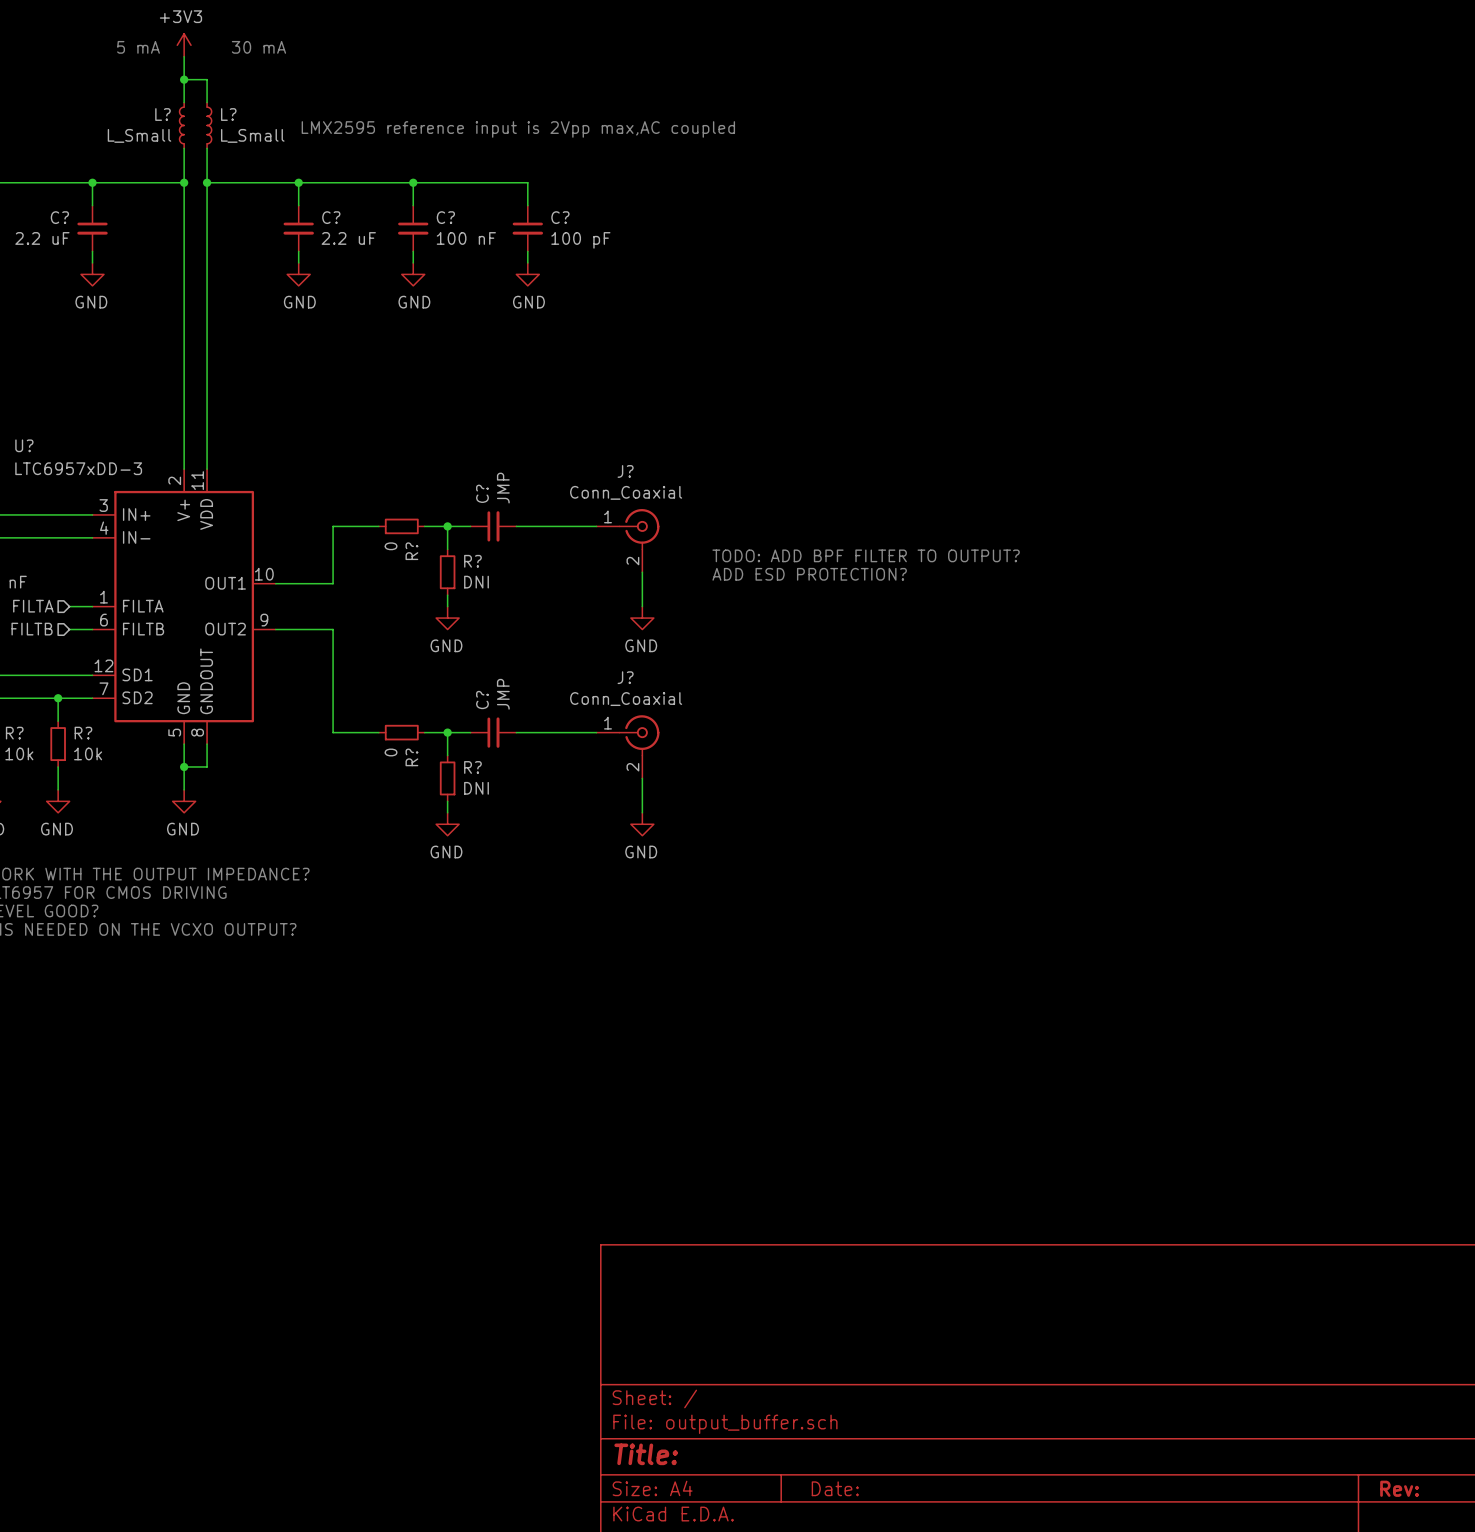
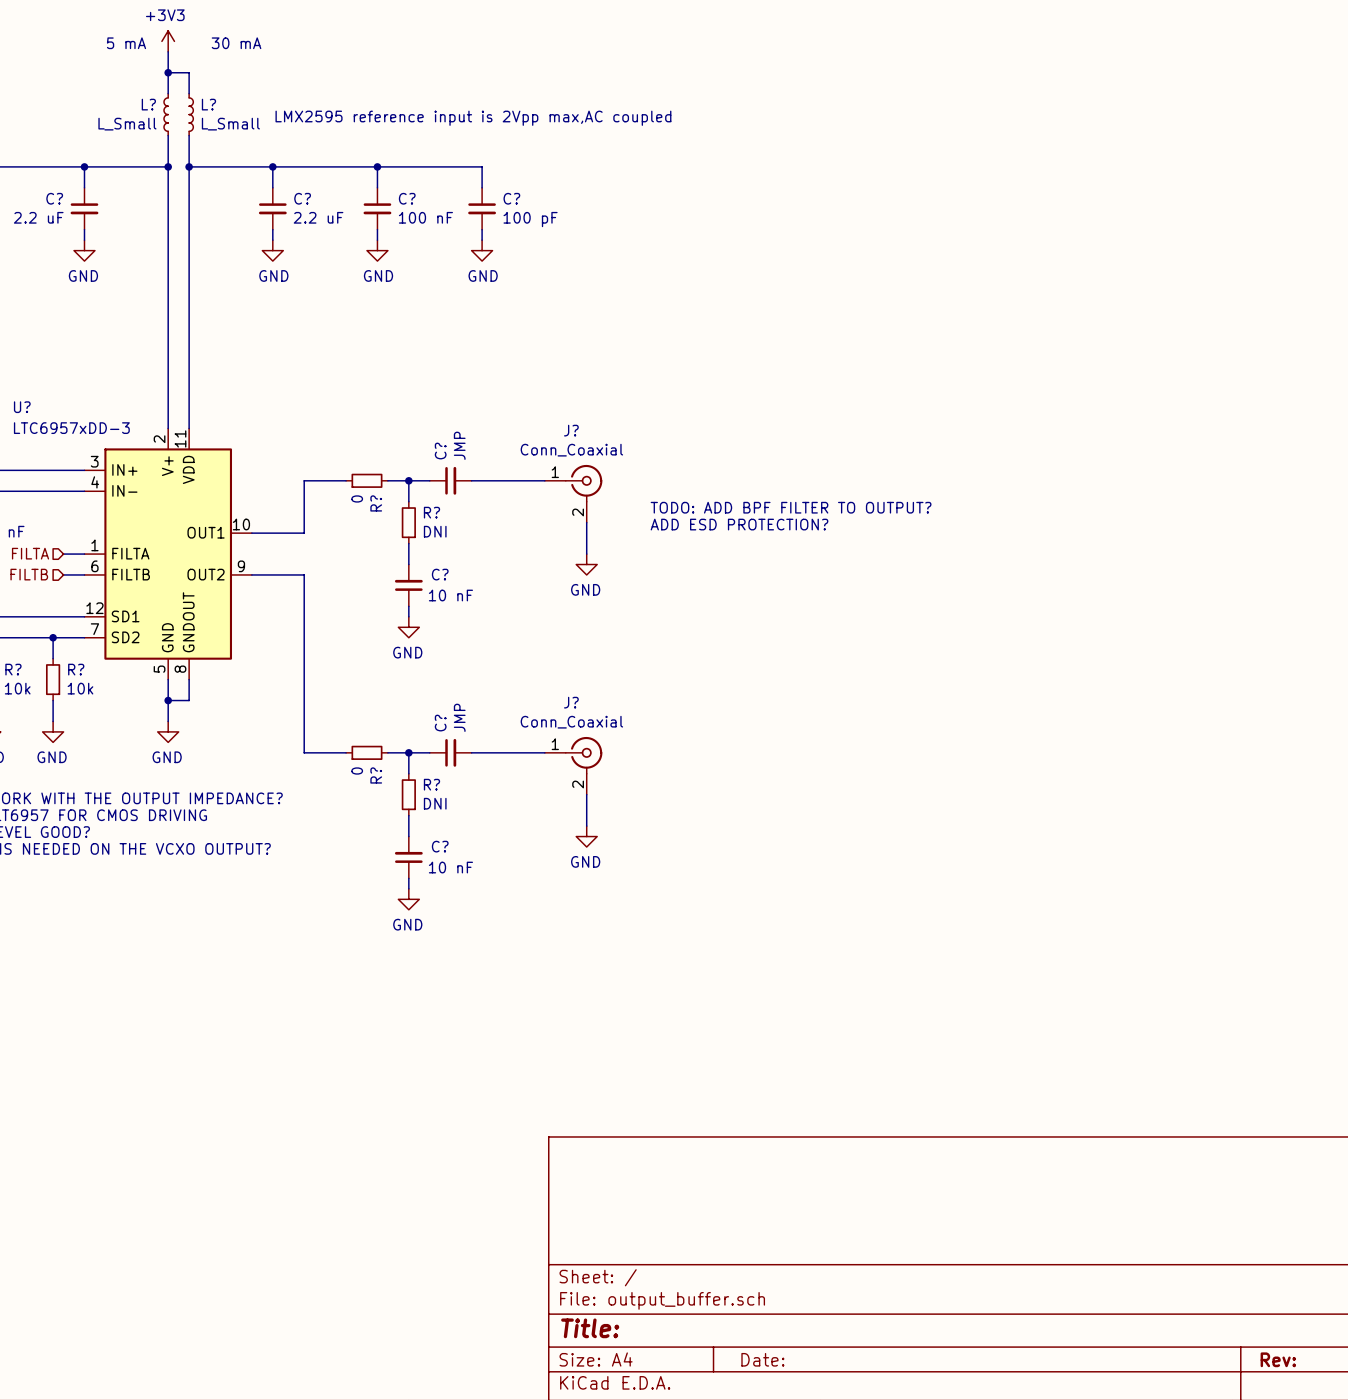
power symbol: GND (447, 618) -> none
C?: none -> 10 nF (408, 585)
wire: none -> (408, 606) (408, 616)
power symbol: none -> GND (408, 627)
wire: (333, 732) (378, 732) -> (304, 669) (304, 752) (346, 752)
R? position: (401, 732) -> (366, 752)
wire: (424, 732) (470, 732) -> (387, 752) (429, 752)
wire: (447, 732) (447, 755) -> (408, 752) (408, 773)
junction: (447, 732) -> none
C? position: (493, 732) -> (450, 752)
wire: (516, 732) (596, 732) -> (471, 752) (544, 752)
J? position: (628, 746) -> (573, 765)
R? position: (447, 778) -> (408, 794)
wire: (642, 778) (642, 812) -> (586, 794) (586, 826)
wire: (447, 801) (447, 812) -> (408, 878) (408, 888)
power symbol: GND (447, 824) -> none
junction: none -> (408, 752)
power symbol position: GND (642, 824) -> GND (586, 836)
wire: none -> (408, 815) (408, 836)
C?: none -> 10 nF (408, 857)
power symbol: none -> GND (408, 899)

